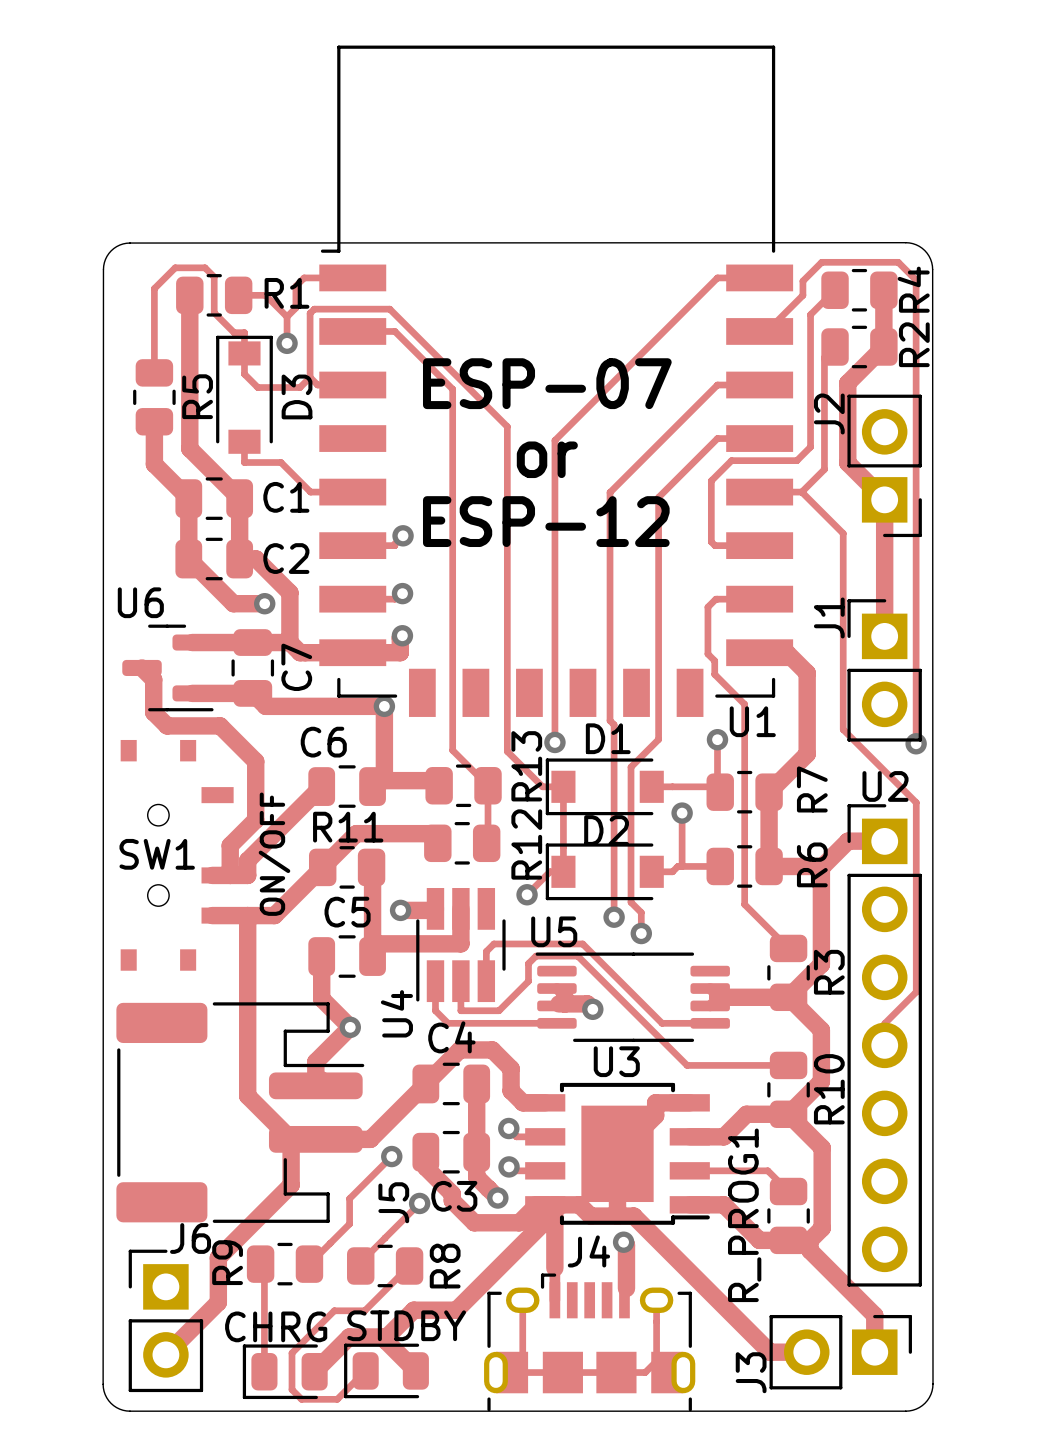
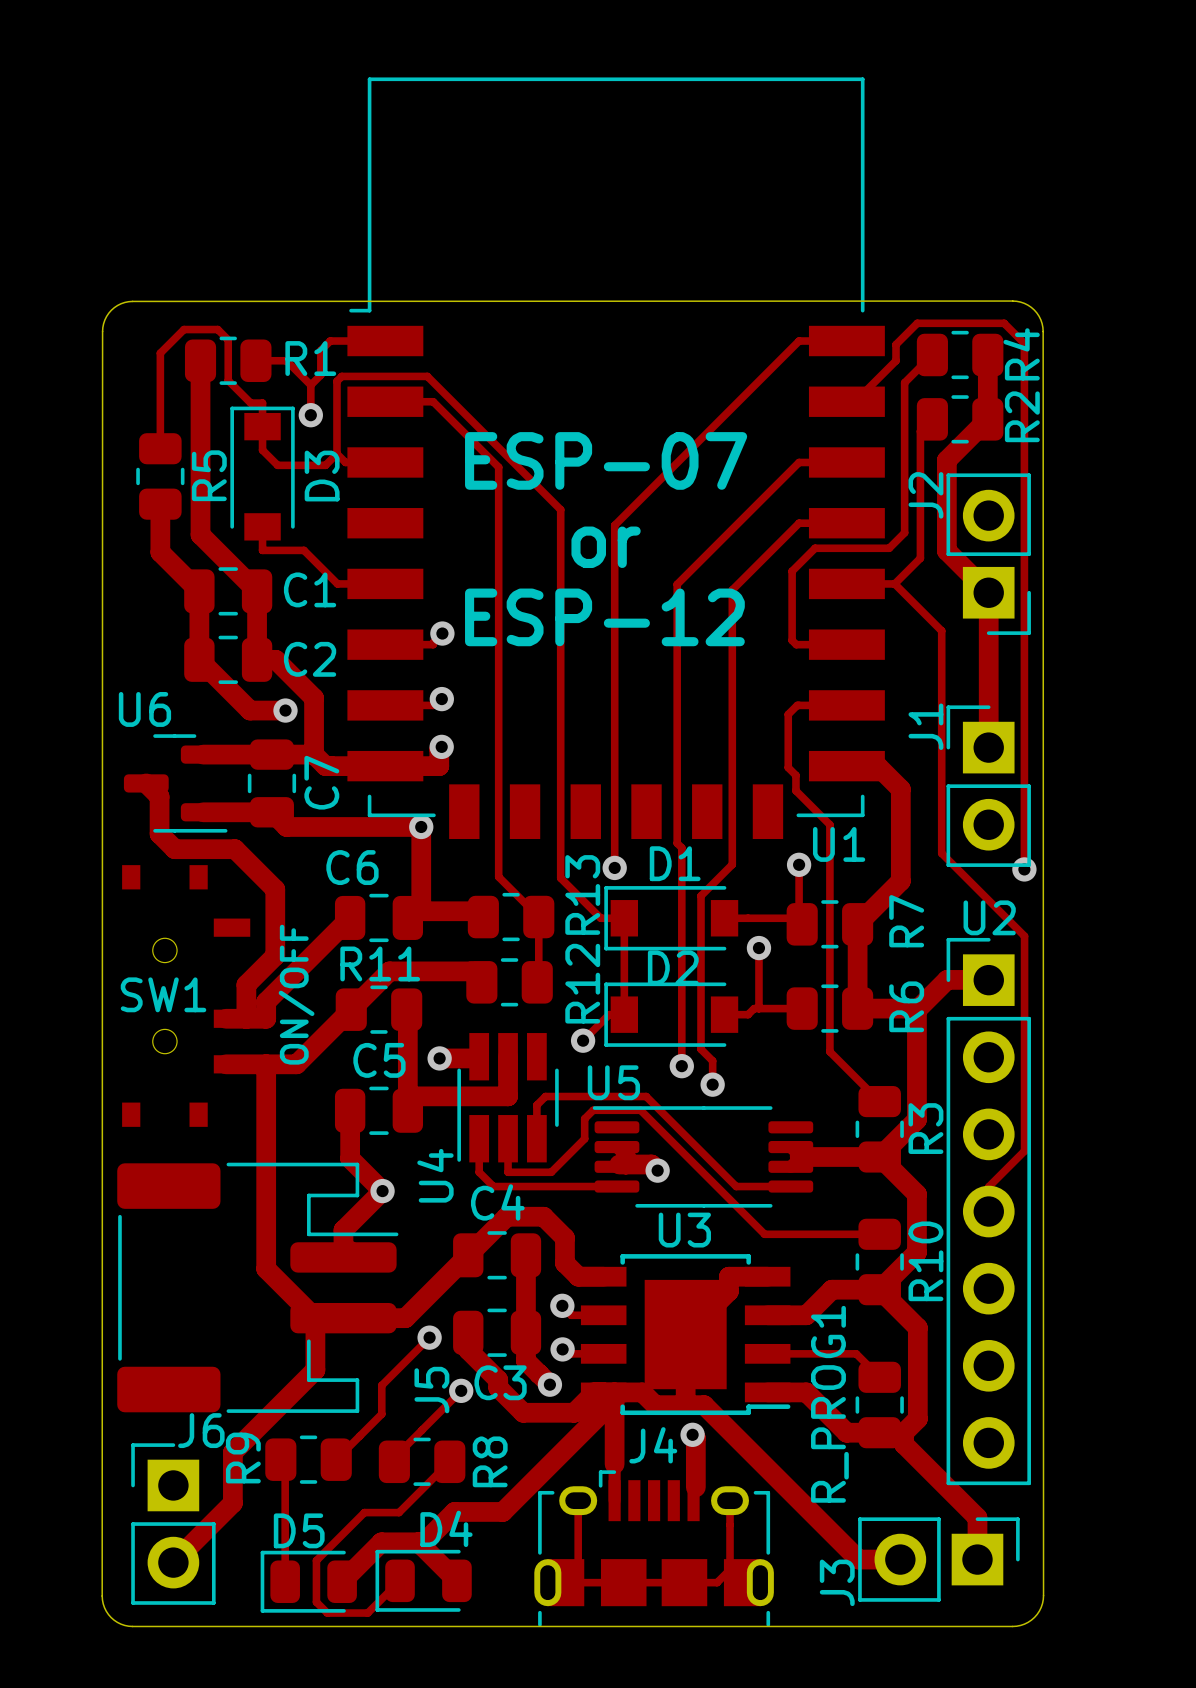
STDBY name: STDBY (406, 1325) -> D4 (446, 1528)
CHRG name: CHRG (276, 1326) -> D5 (299, 1530)

